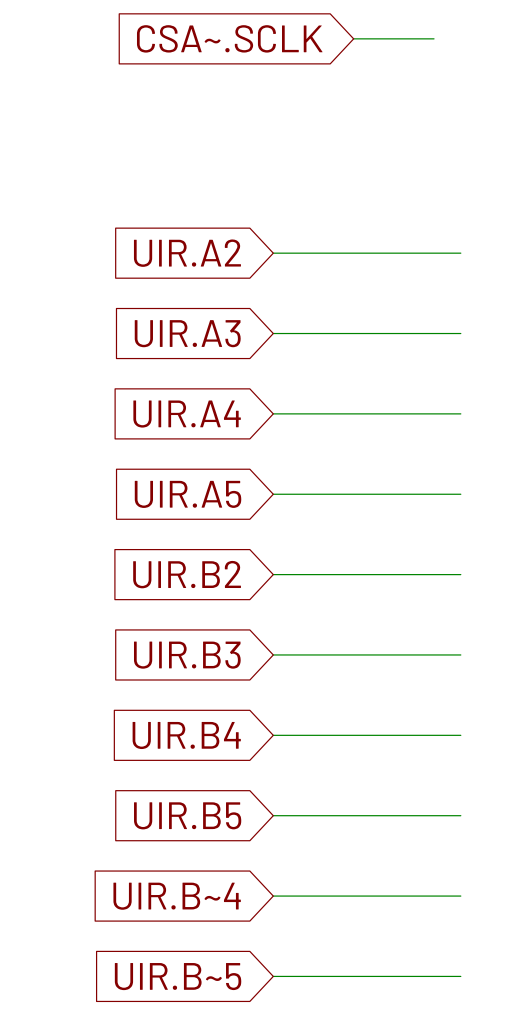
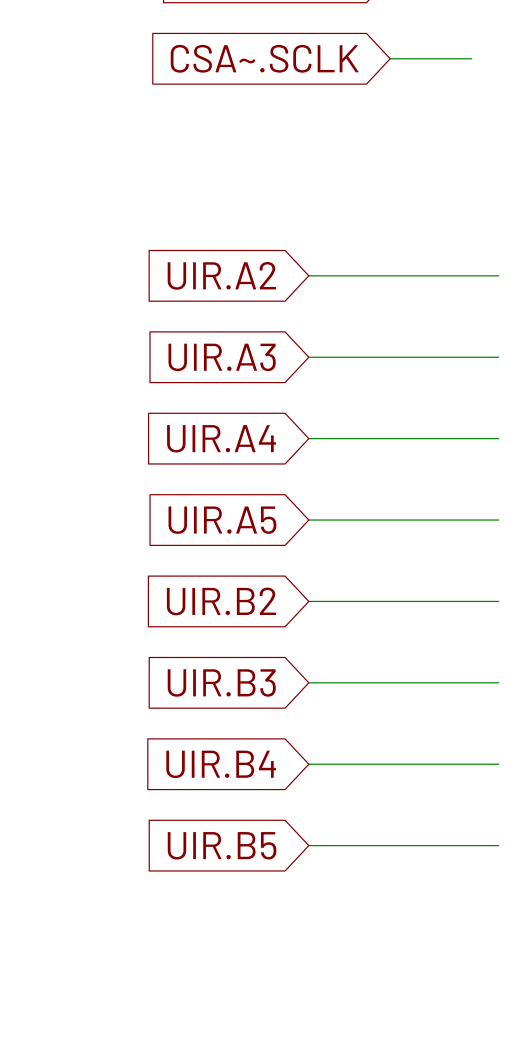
global label: UIR.B~4 (177, 896) -> none
wire: (273, 896) (460, 896) -> none
global label: UIR.B~5 (178, 976) -> none
wire: (273, 976) (460, 976) -> none

